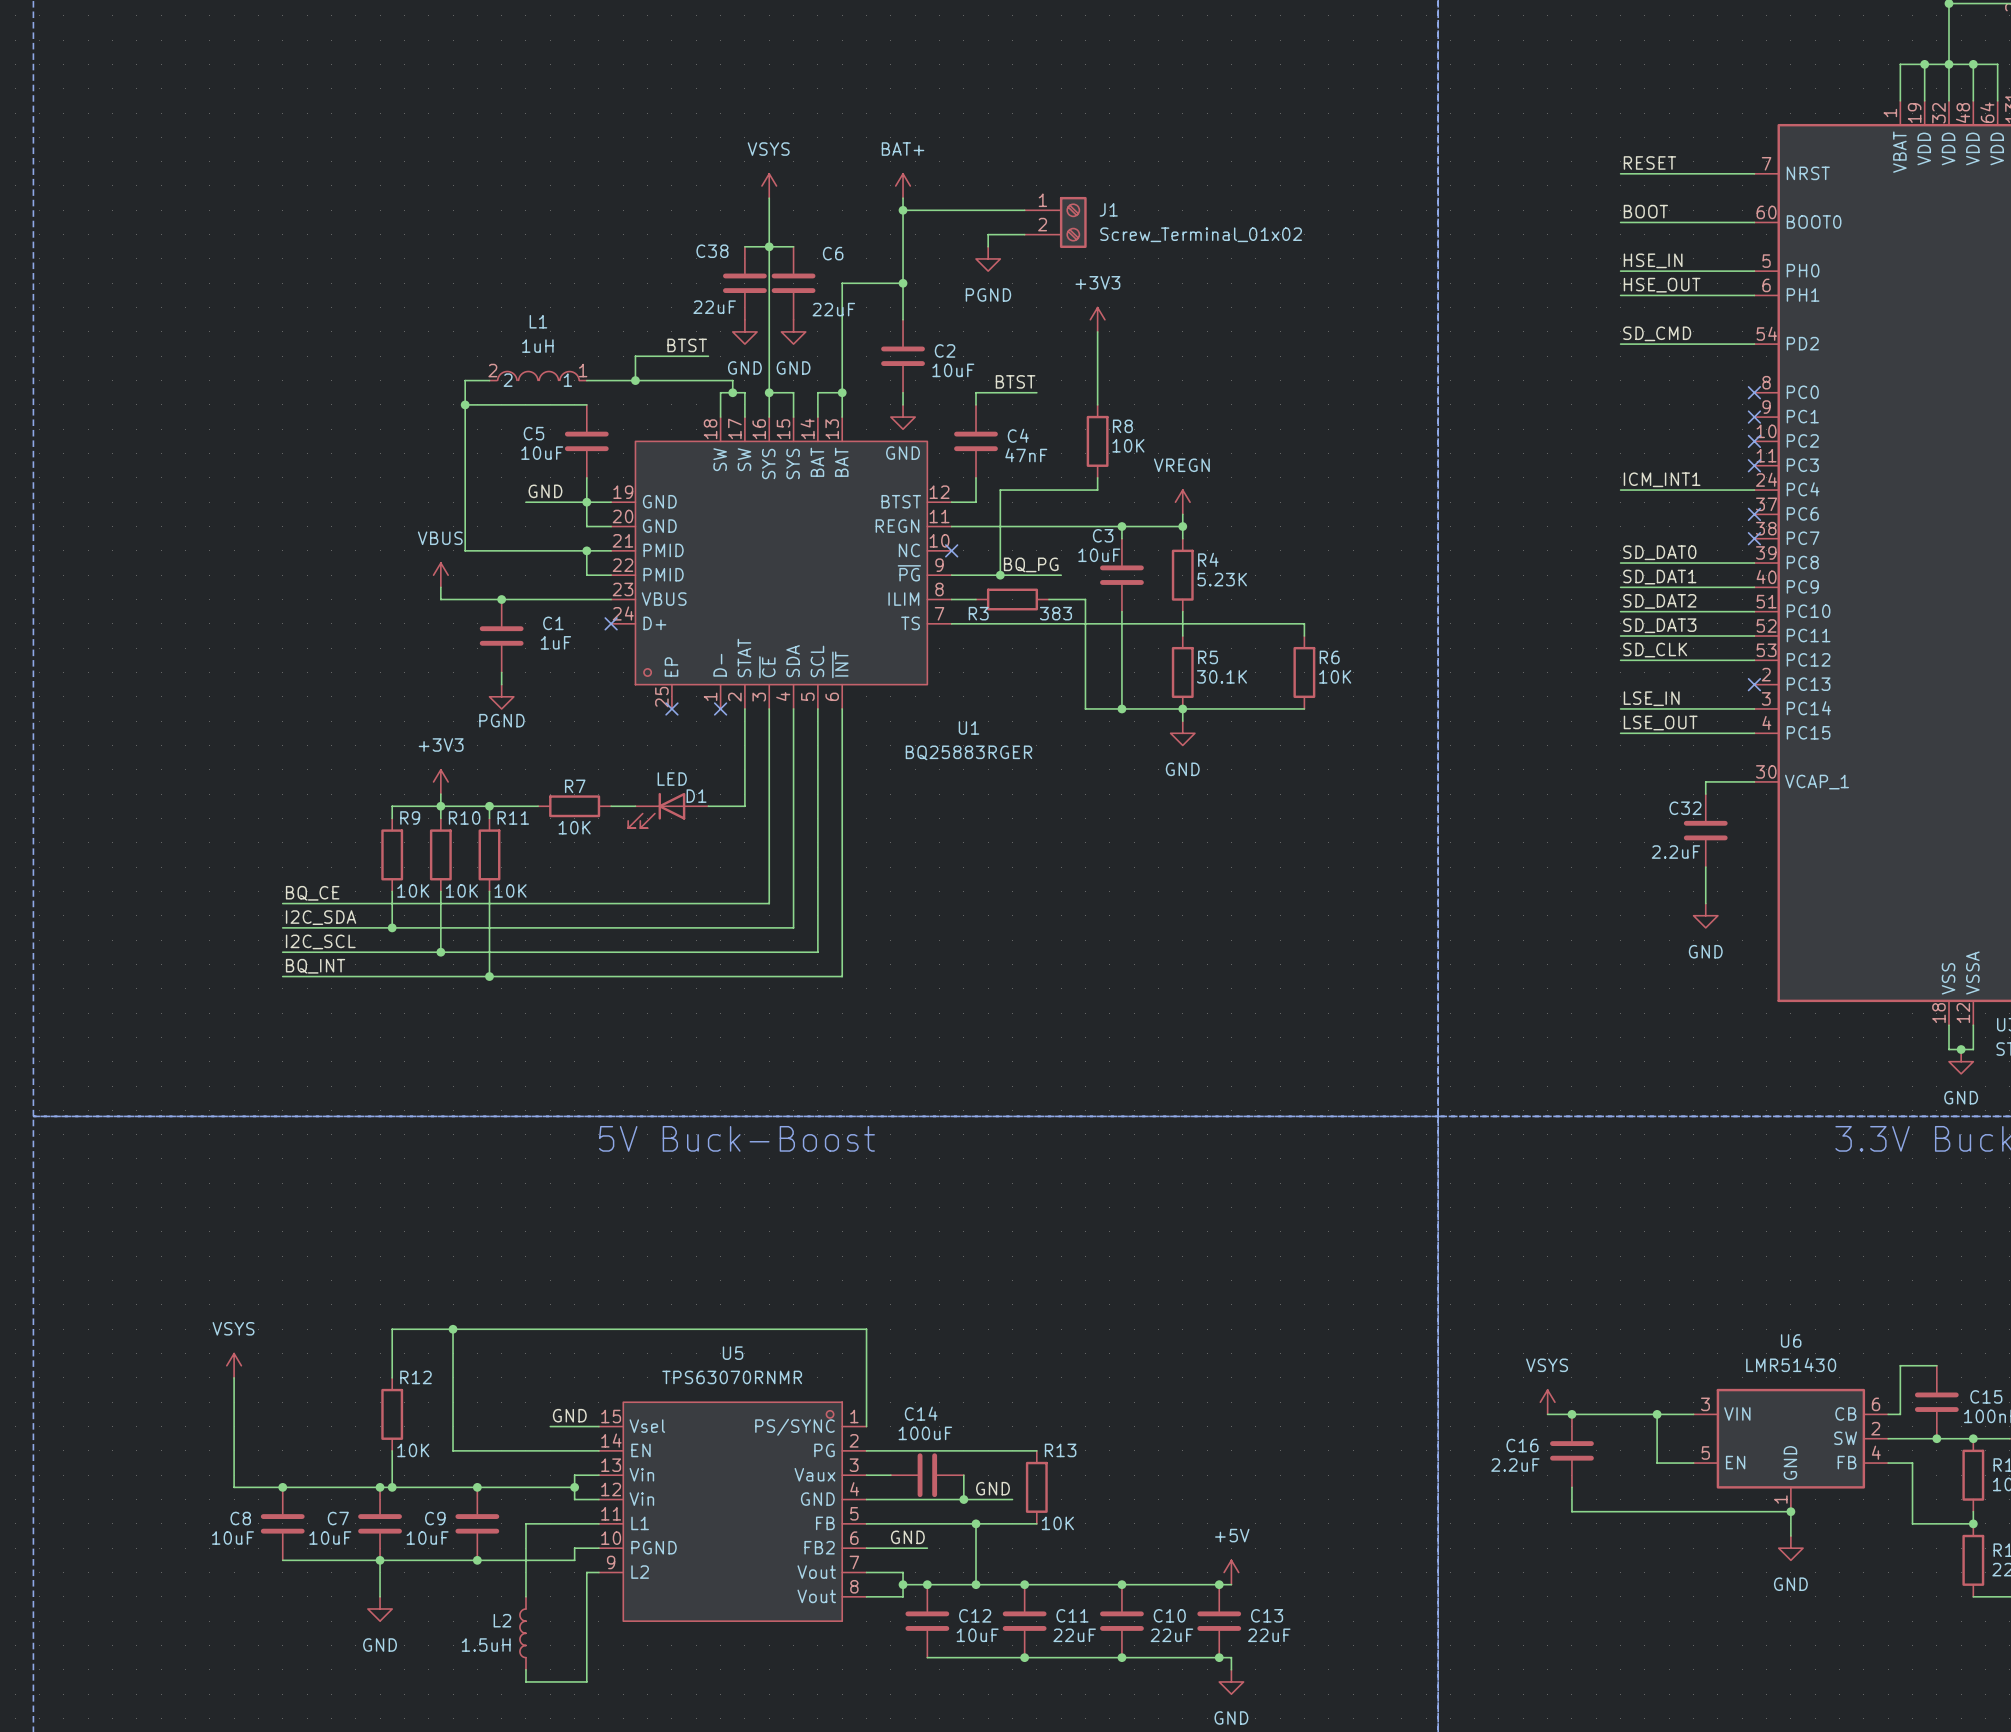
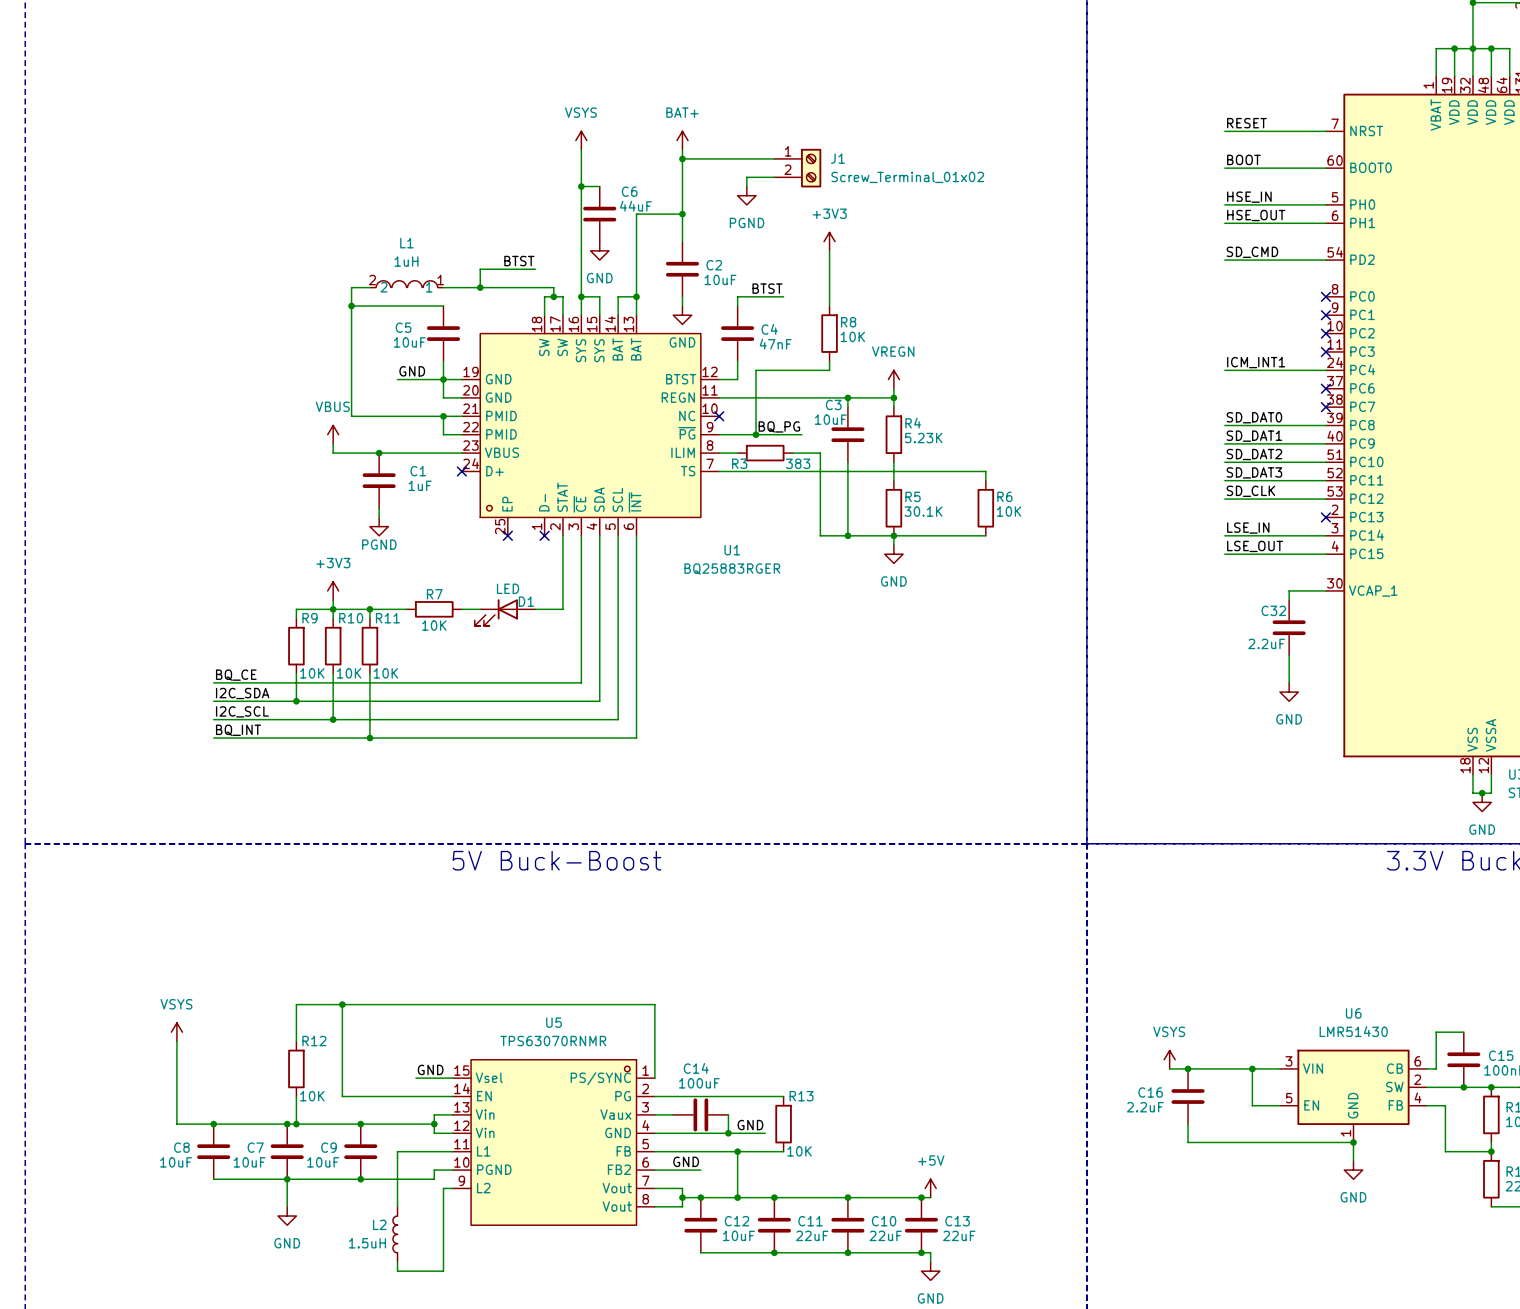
wire: (744, 246) (769, 246) -> none
C38: 22uF (744, 283) -> none
C6 value: 22uF (833, 309) -> 44uF (635, 206)
power symbol: GND (744, 331) -> none

